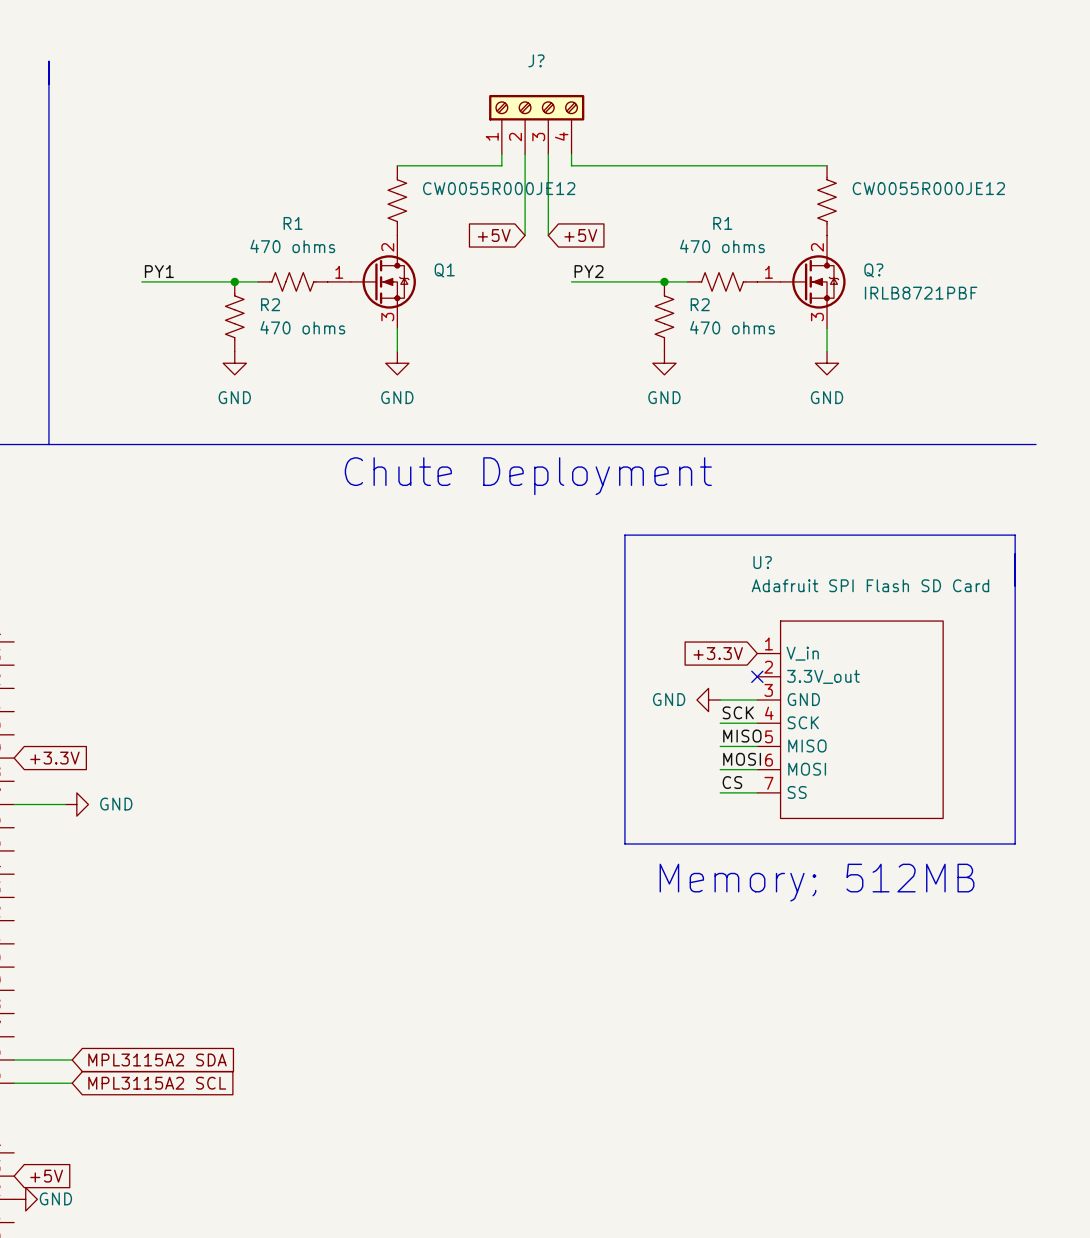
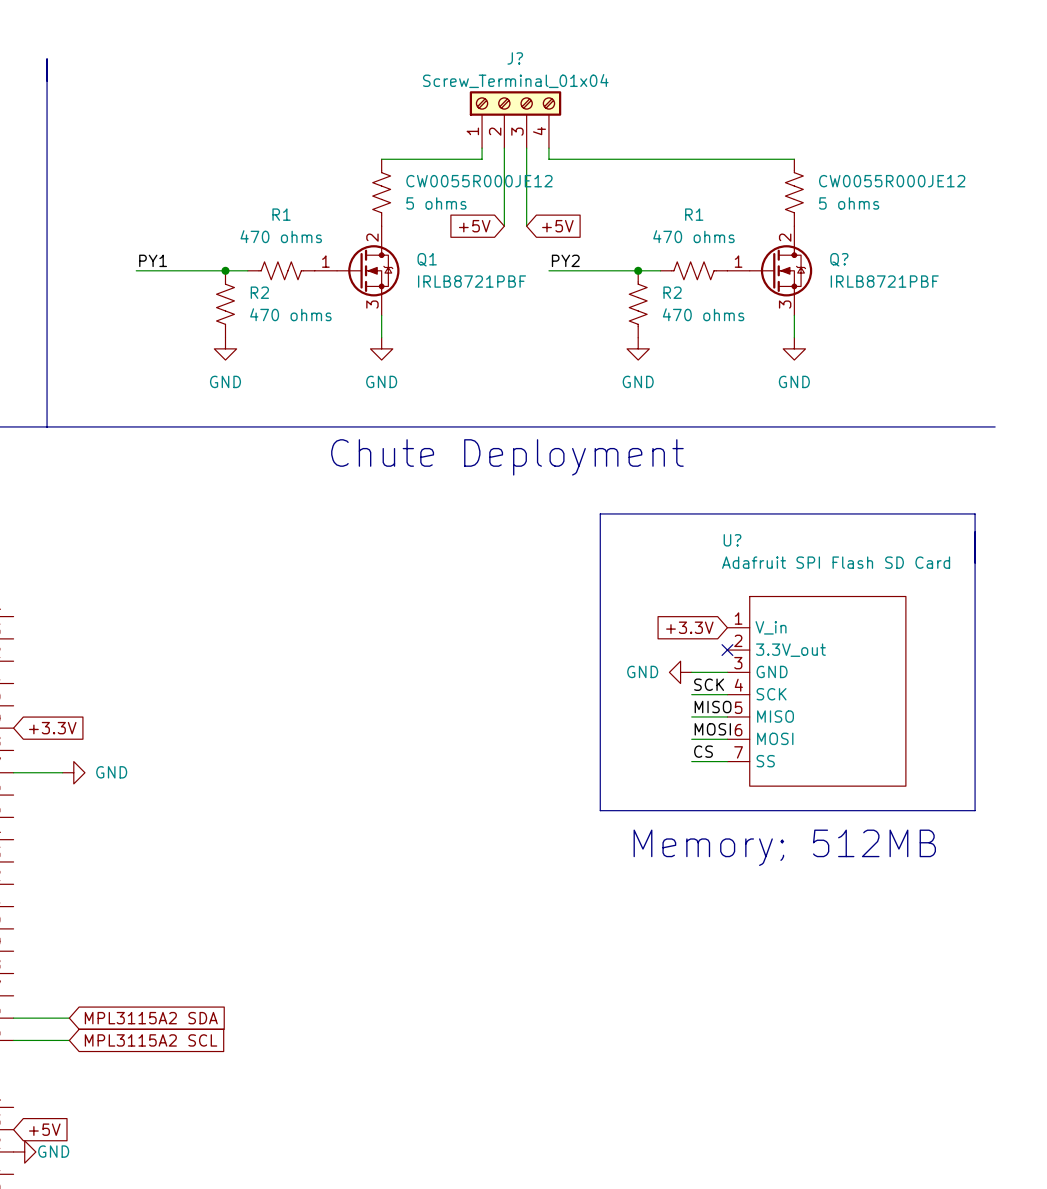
J? value: none -> Screw_Terminal_01x04 (515, 81)
CW0055R000JE12 value: none -> 5 ohms (436, 203)
CW0055R000JE12 value: none -> 5 ohms (849, 203)
Q1 value: none -> IRLB8721PBF (472, 281)

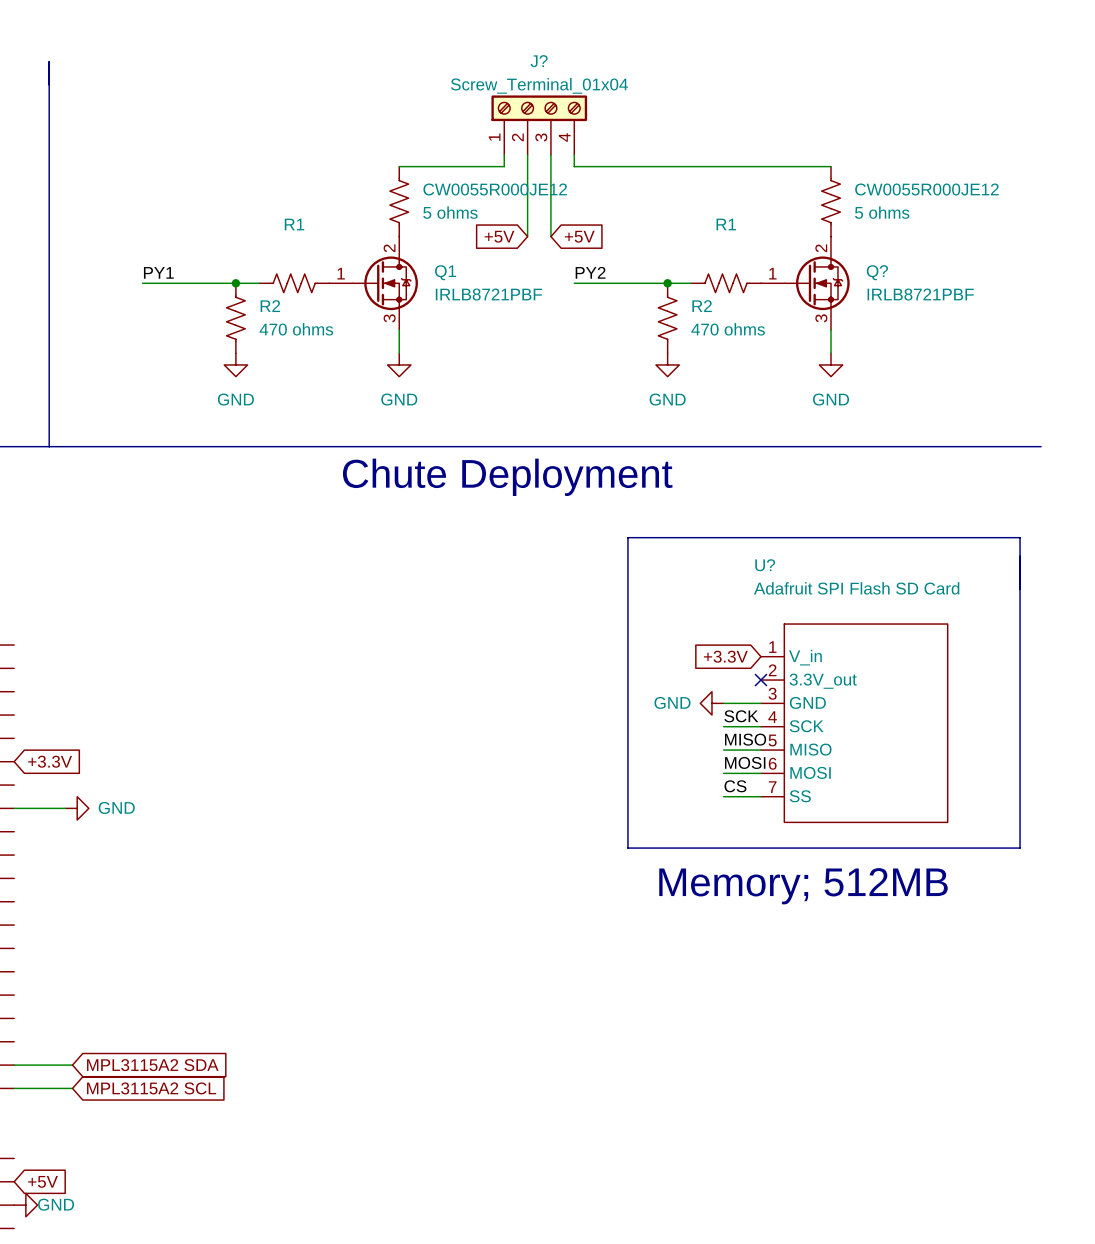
R1 value: 470 ohms (281, 236) -> none
R1 value: 470 ohms (693, 236) -> none

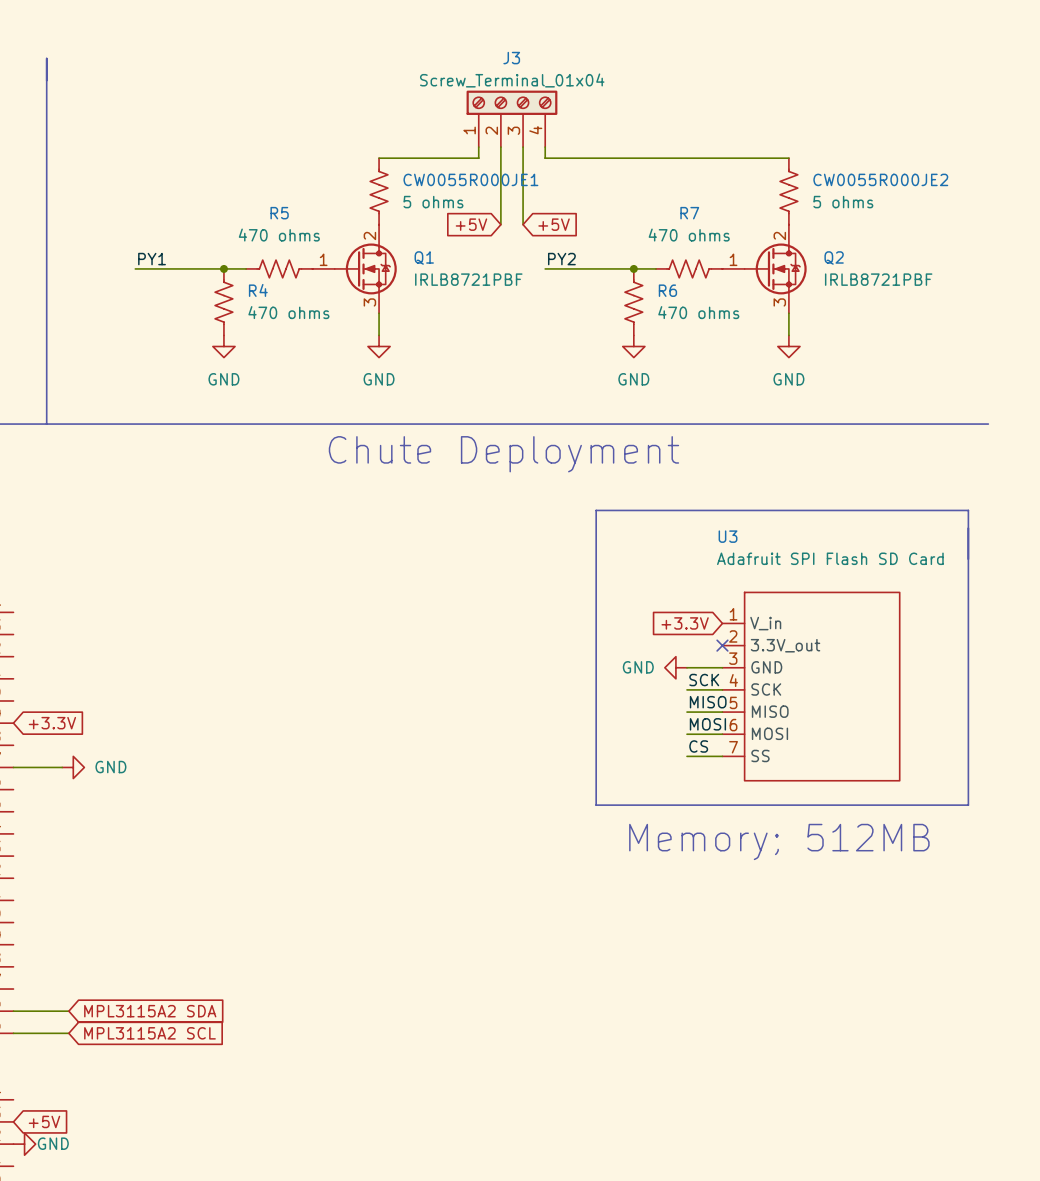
J? name: J? (539, 61) -> J3 (511, 58)
CW0055R000JE12 name: CW0055R000JE12 (495, 189) -> CW0055R000JE1 (470, 179)
CW0055R000JE12 name: CW0055R000JE12 (926, 189) -> CW0055R000JE2 (880, 179)
R1 name: R1 (294, 224) -> R5 (279, 213)
R1 name: R1 (726, 224) -> R7 (689, 213)
R1 value: none -> 470 ohms (279, 235)
R1 value: none -> 470 ohms (689, 235)
Q? name: Q? (877, 272) -> Q2 (834, 257)
R2 name: R2 (270, 306) -> R4 (258, 290)
R2 name: R2 (702, 306) -> R6 (667, 290)
U? name: U? (765, 565) -> U3 (728, 536)

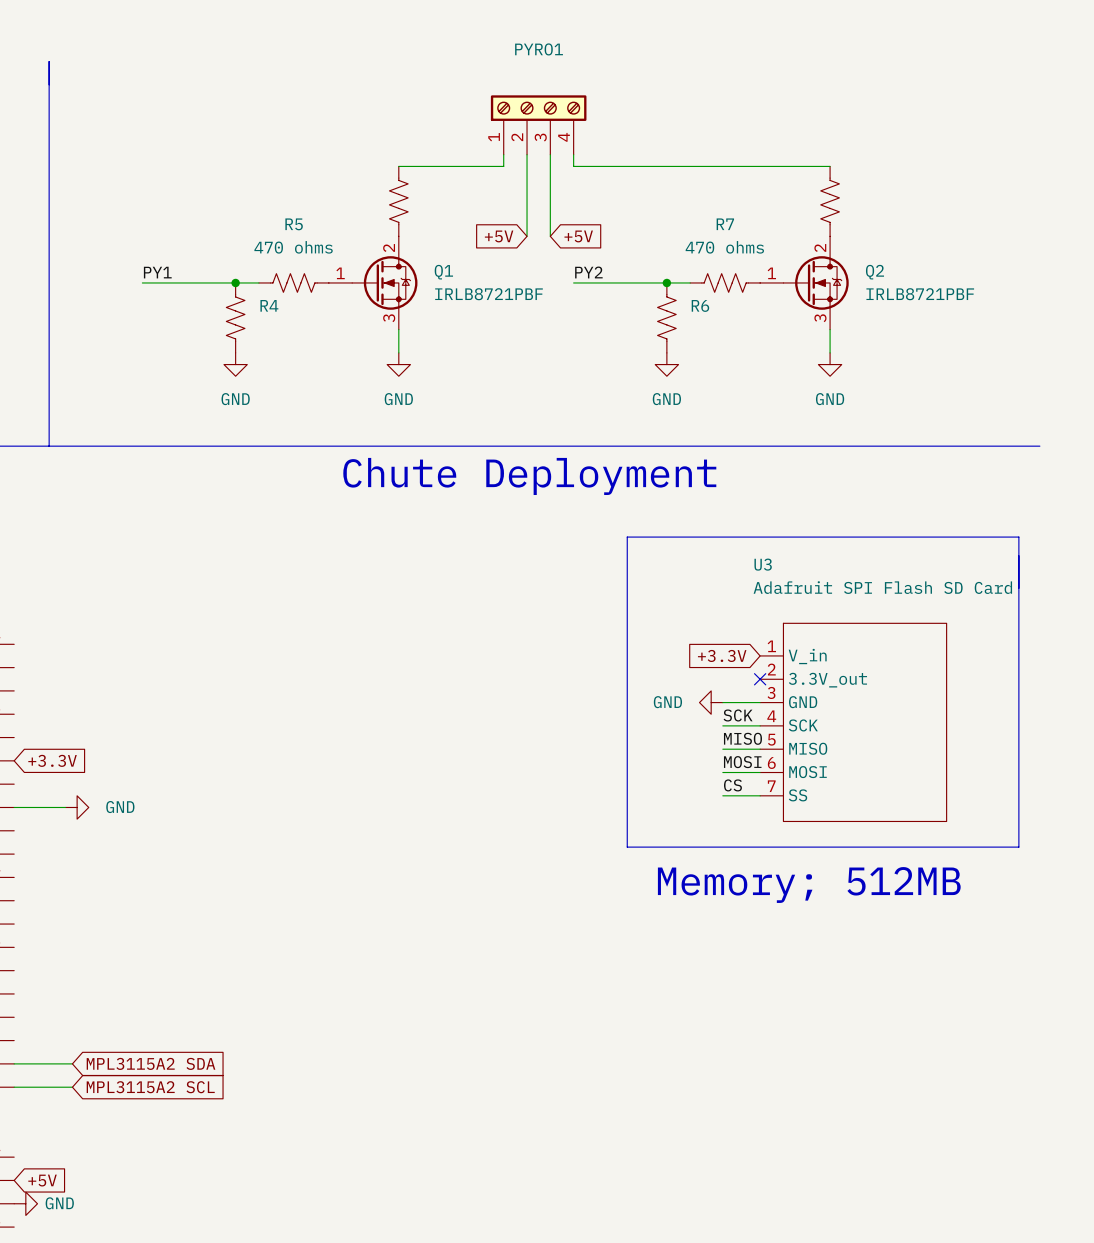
J3 name: J3 (511, 58) -> PYRO1 (539, 49)
J3 value: Screw_Terminal_01x04 (512, 80) -> none
CW0055R000JE1 name: CW0055R000JE1 (470, 179) -> none
CW0055R000JE2 name: CW0055R000JE2 (880, 179) -> none
CW0055R000JE1 value: 5 ohms (433, 202) -> none
CW0055R000JE2 value: 5 ohms (843, 202) -> none
R4 value: 470 ohms (288, 312) -> none
R6 value: 470 ohms (698, 312) -> none

